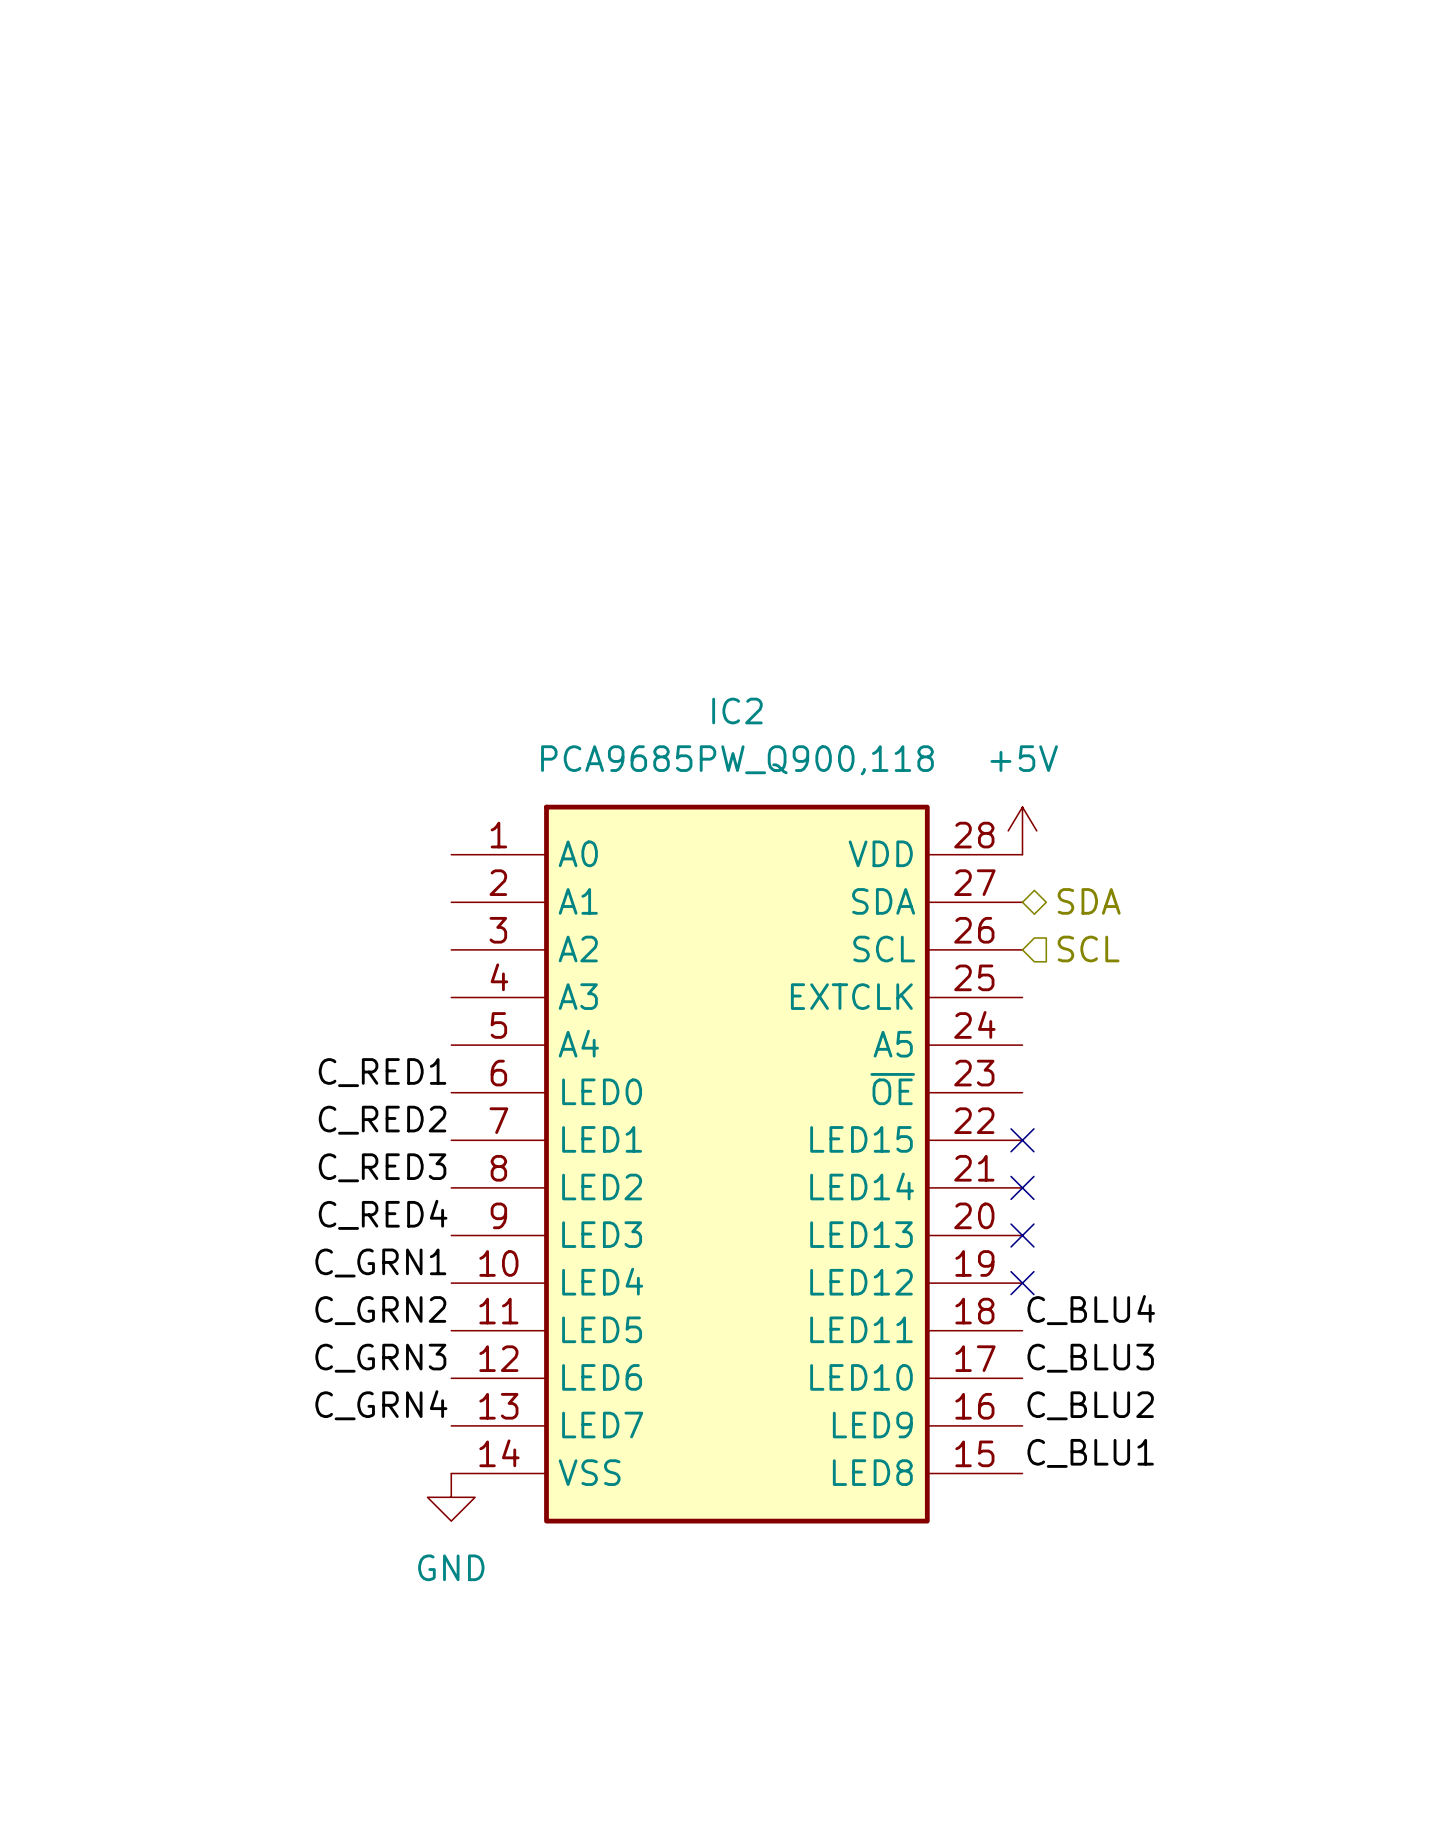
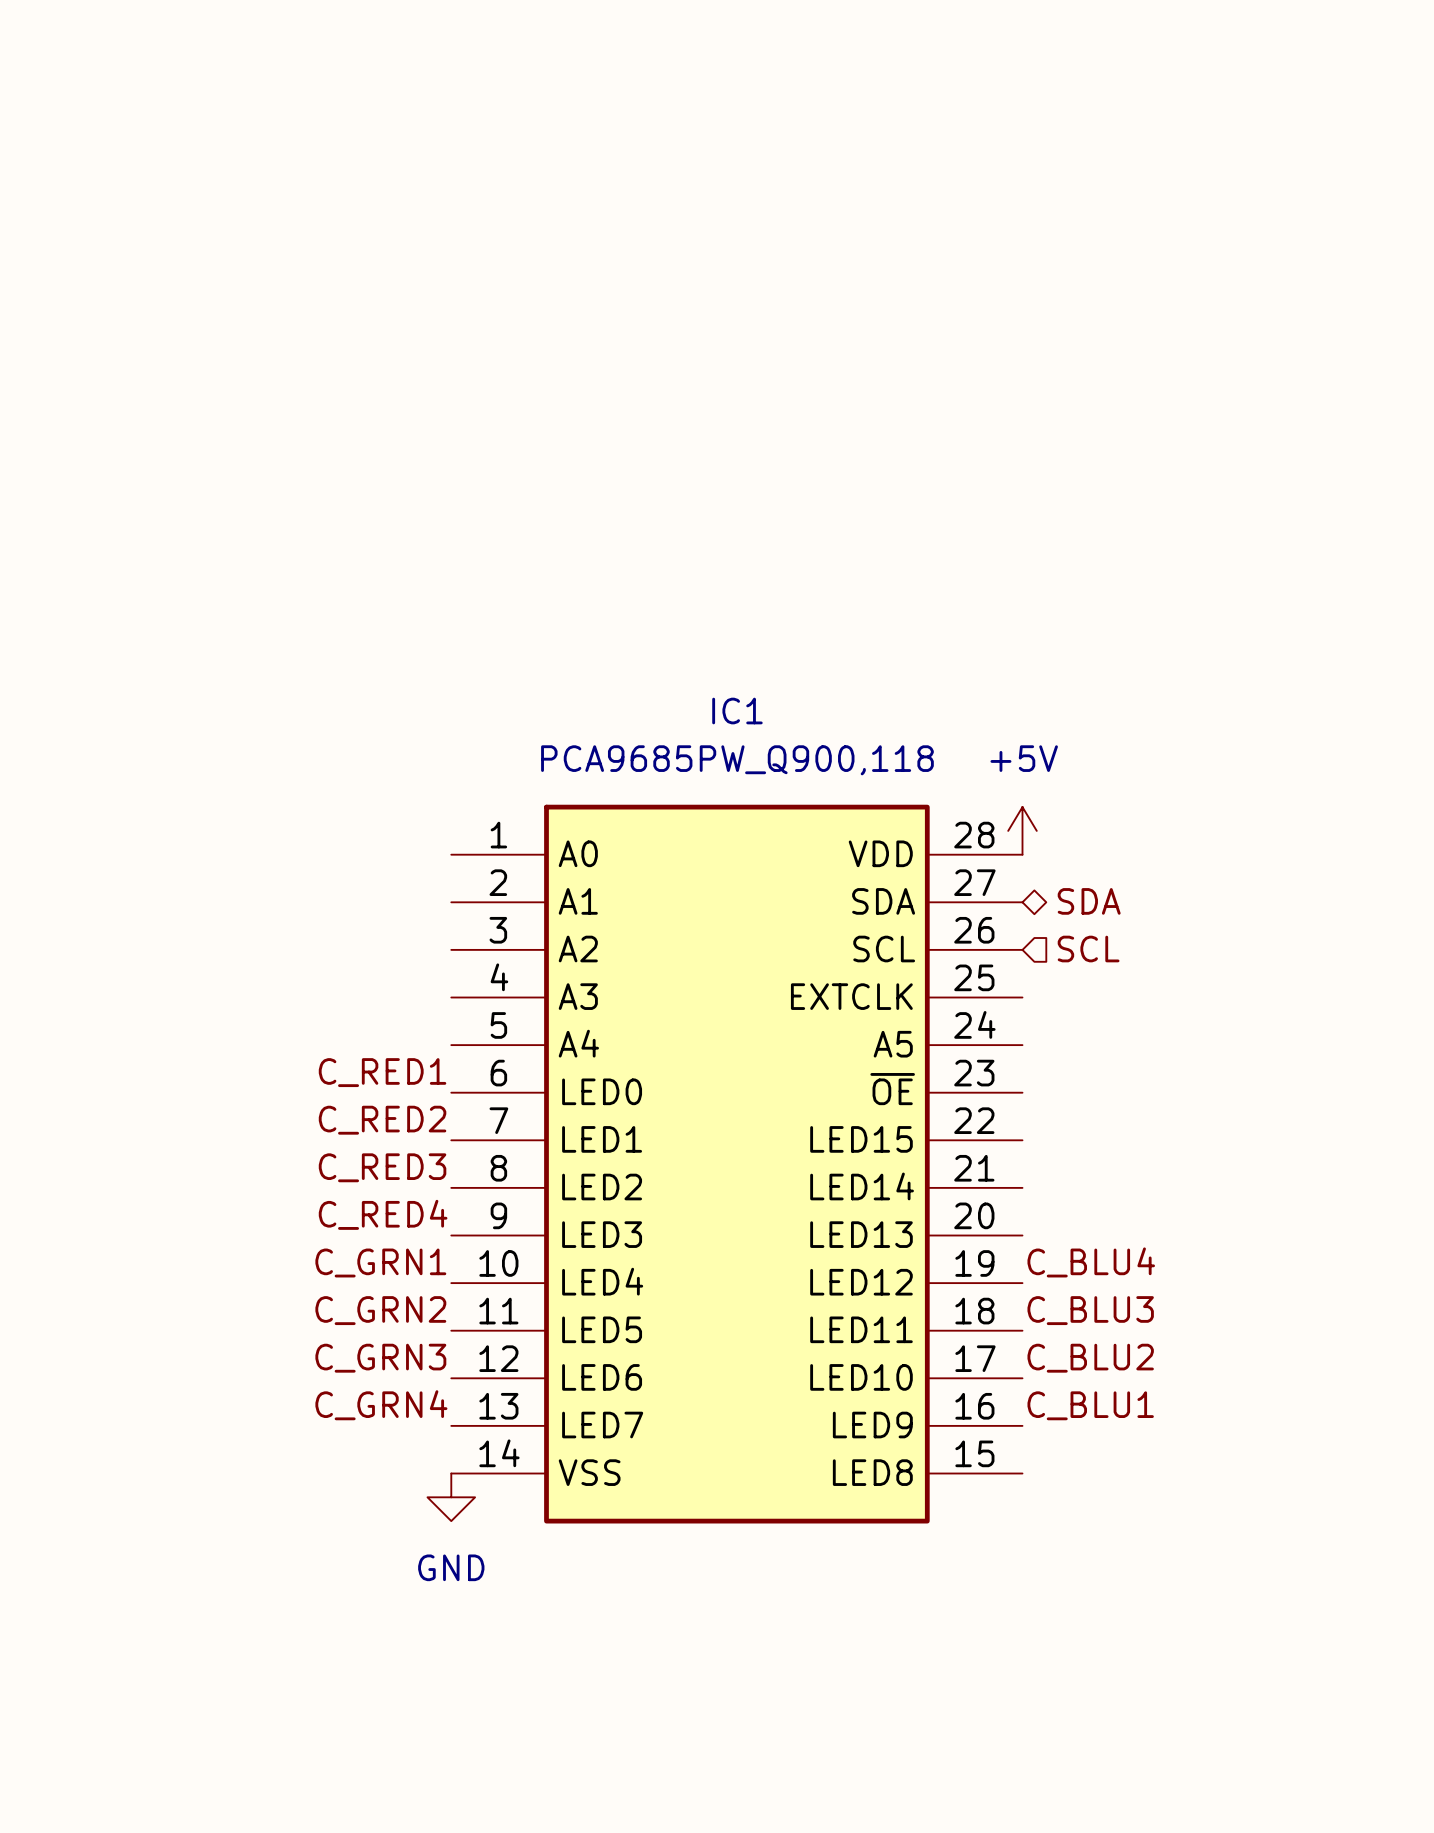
IC2 name: IC2 (737, 711) -> IC1 (737, 711)
no-connect mark: (1022, 1140) -> none
no-connect mark: (1022, 1187) -> none
no-connect mark: (1022, 1235) -> none
label: none -> C_BLU4 (1091, 1262)
no-connect mark: (1022, 1283) -> none
label: C_BLU4 (1091, 1310) -> C_BLU3 (1090, 1310)
label: C_BLU3 (1090, 1358) -> C_BLU2 (1090, 1358)
label: C_BLU2 (1090, 1405) -> C_BLU1 (1090, 1405)
label: C_BLU1 (1090, 1453) -> none

